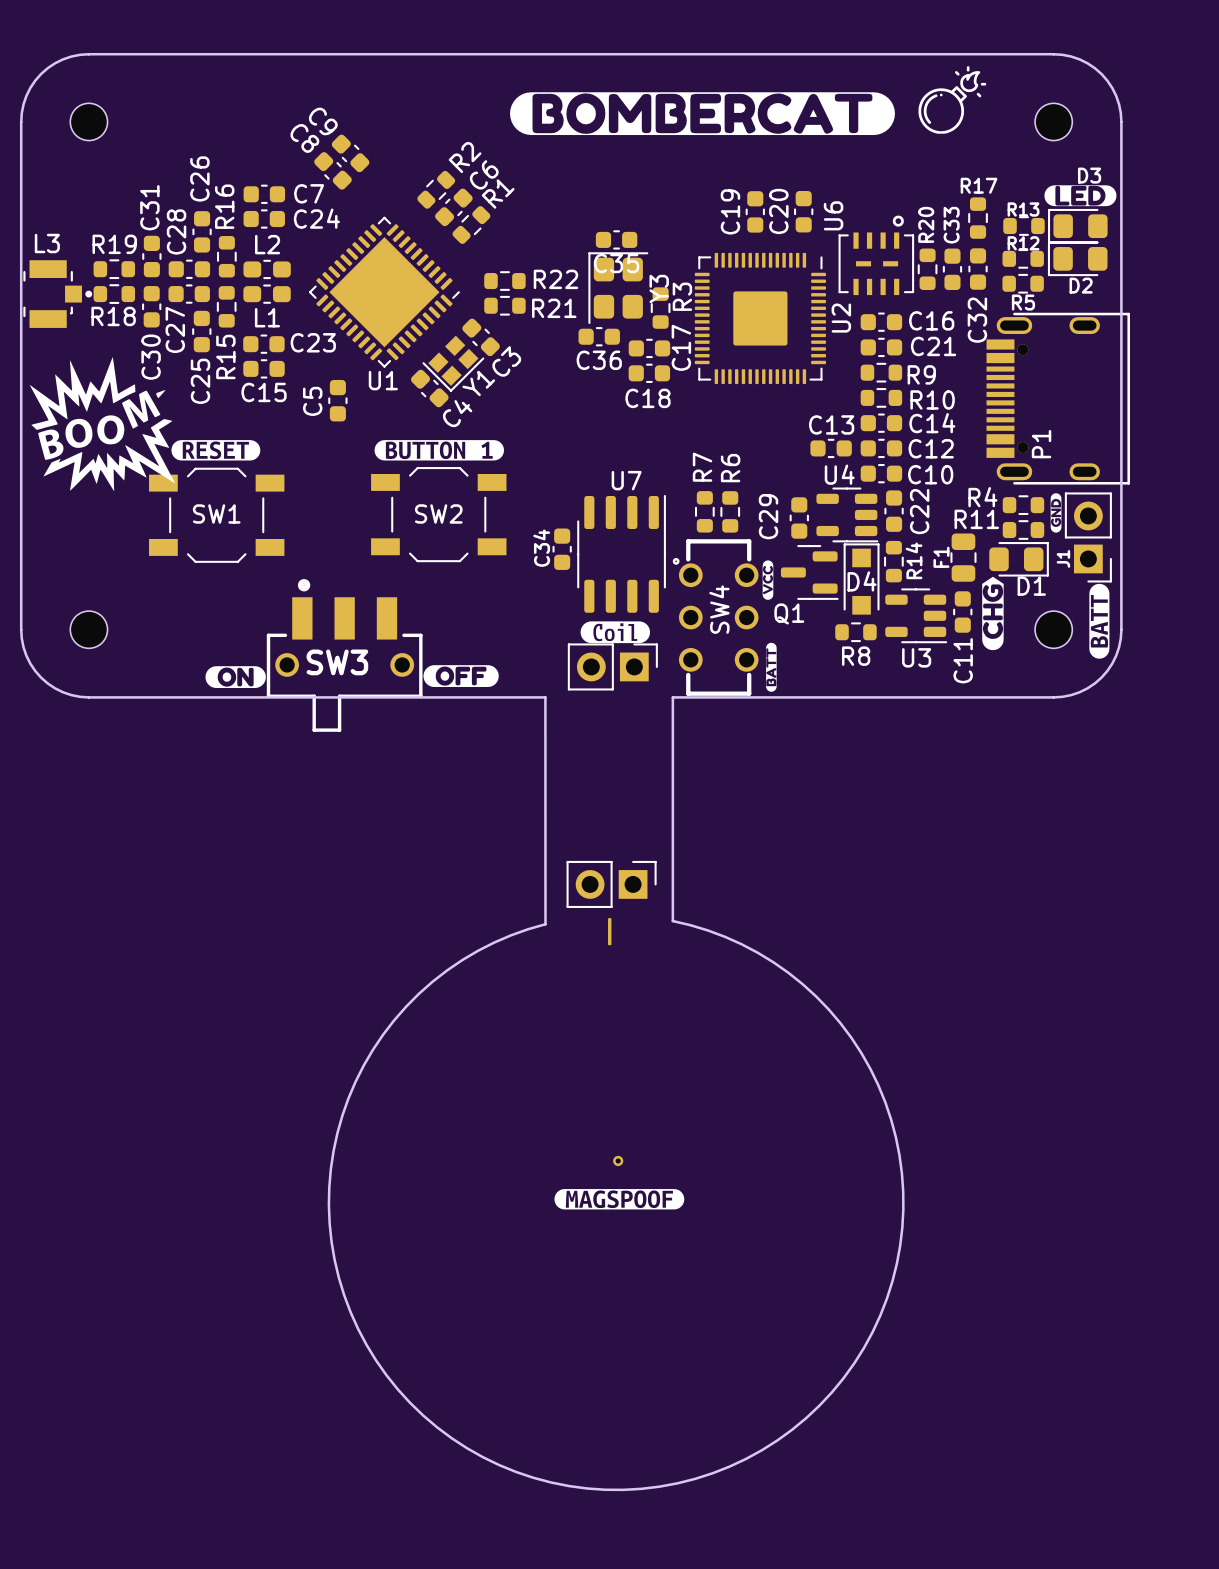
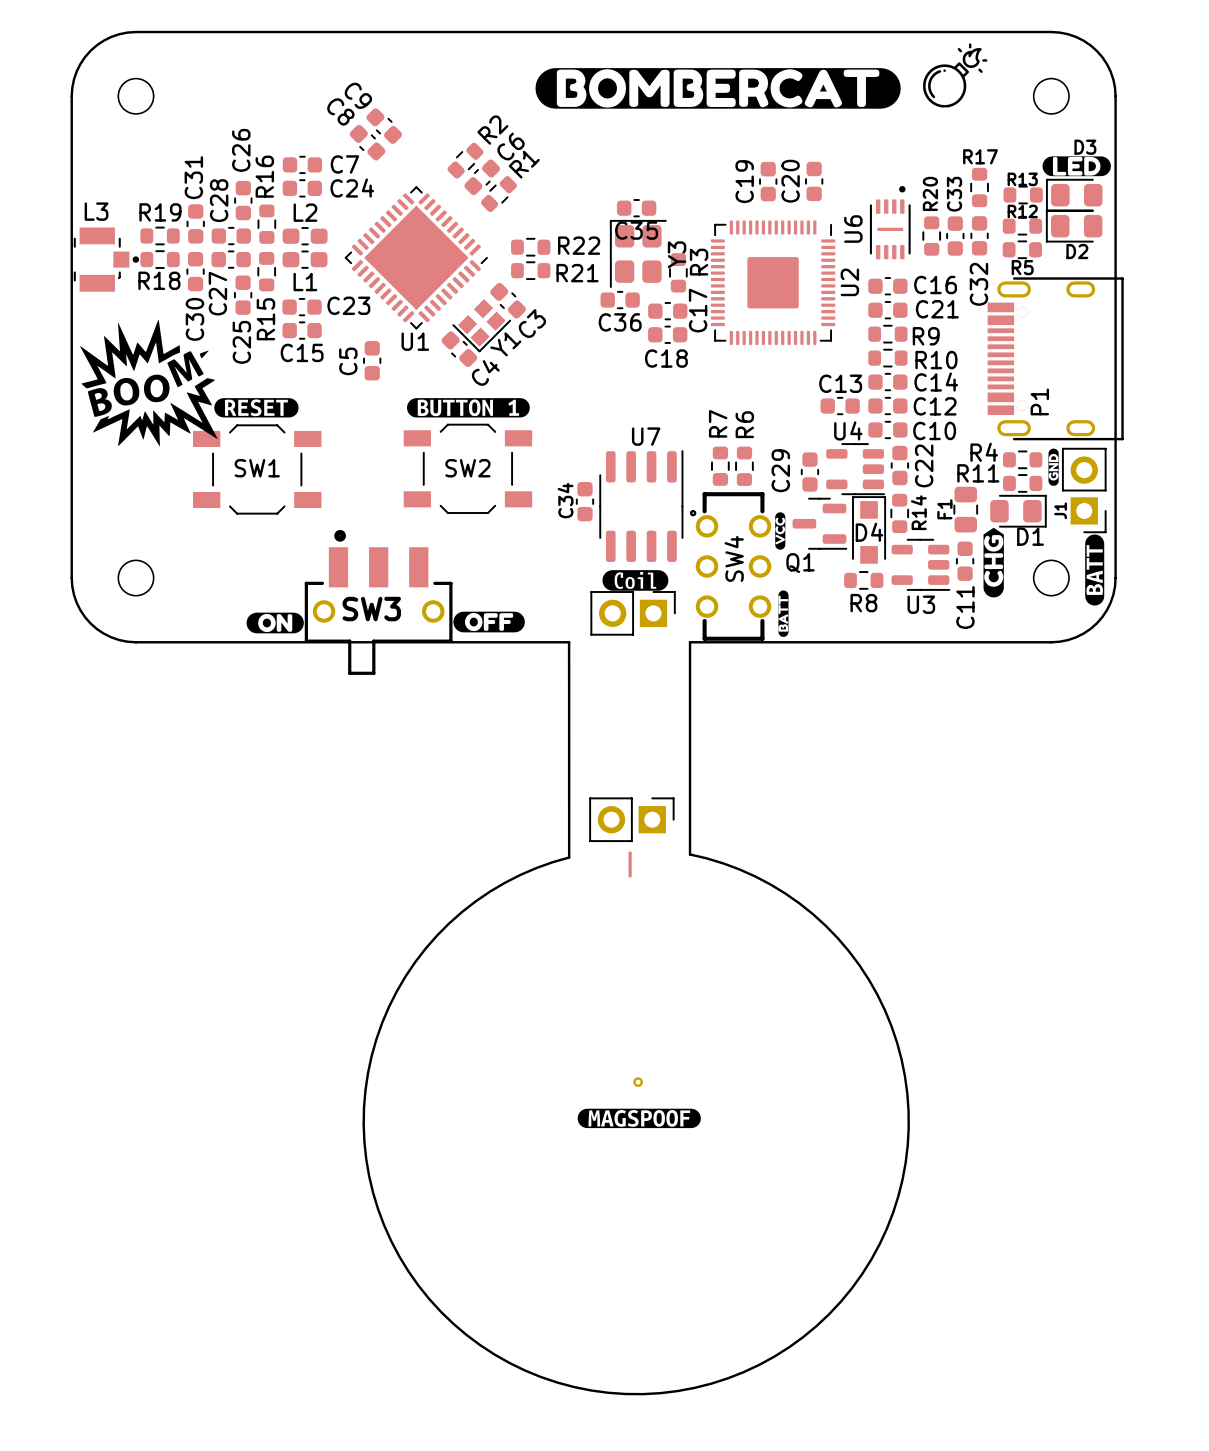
U6 name position: U6 (833, 215) -> U6 (853, 229)
U6 footprint: [838, 215, 915, 296] -> [869, 186, 911, 260]

